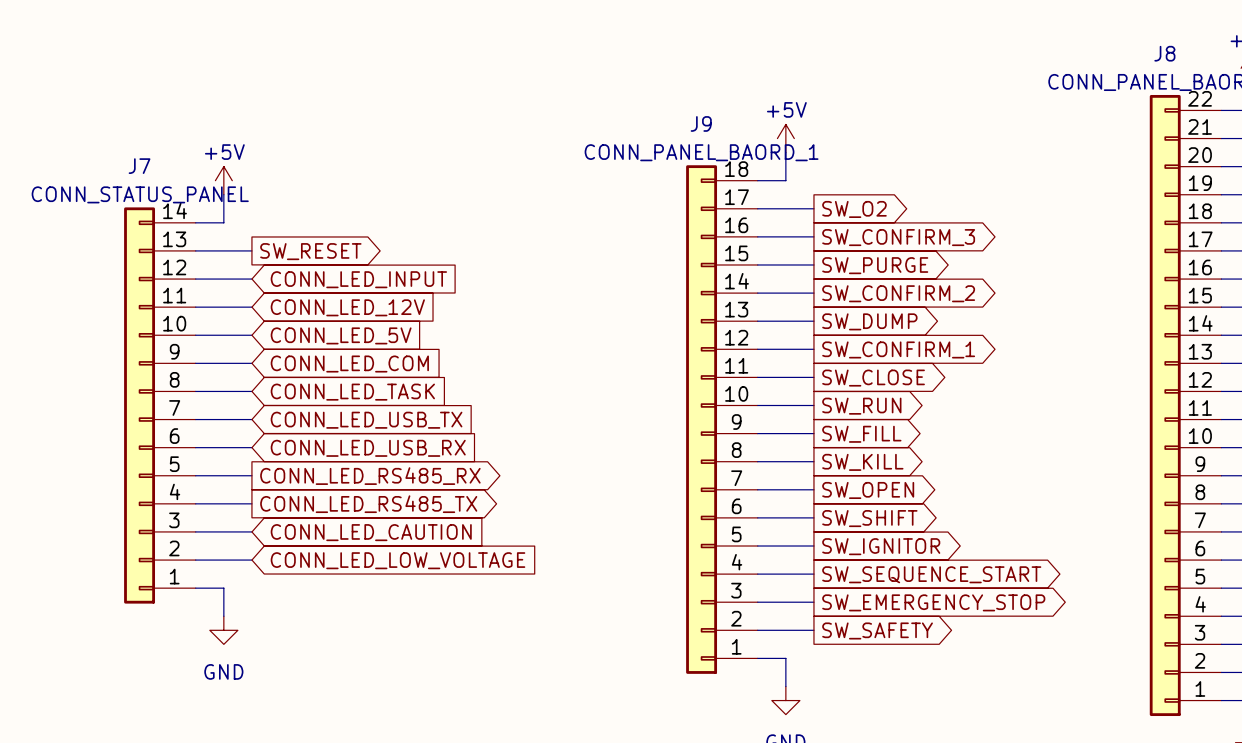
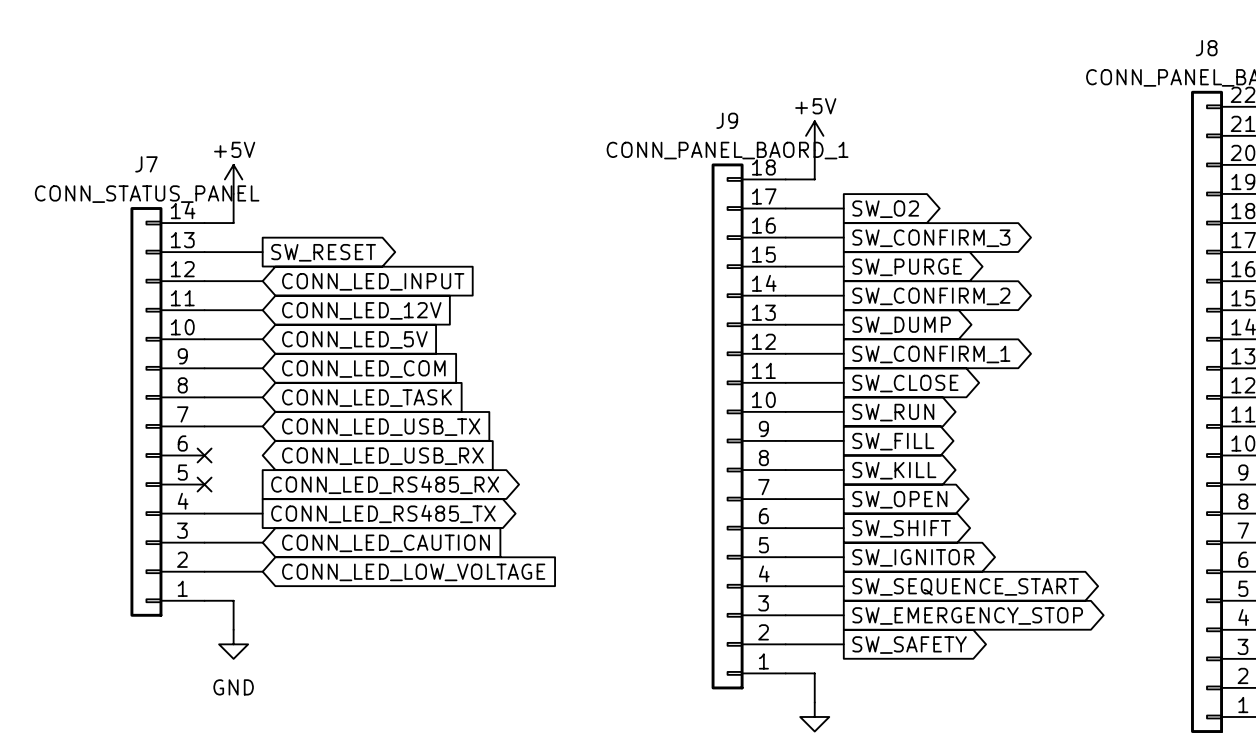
wire: (195, 447) (251, 447) -> none
no-connect mark: none -> (204, 455)
wire: (195, 475) (251, 475) -> none
no-connect mark: none -> (204, 484)

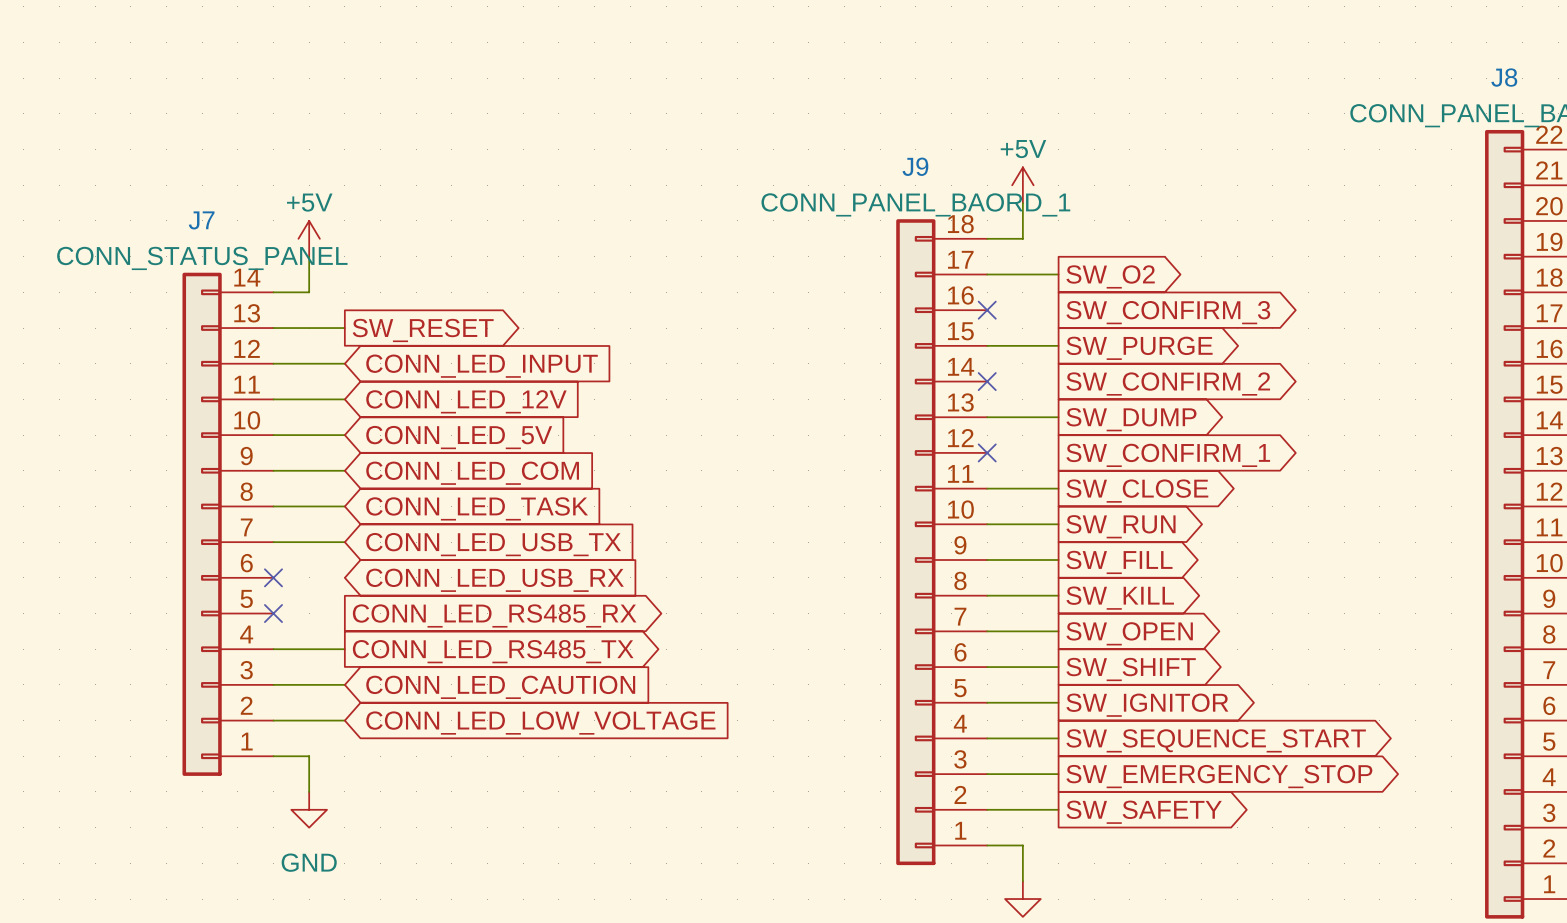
wire: (785, 237) (843, 237) -> none
no-connect mark: none -> (987, 310)
wire: (785, 295) (843, 295) -> none
no-connect mark: none -> (987, 381)
wire: (785, 353) (843, 353) -> none
no-connect mark: none -> (987, 452)

